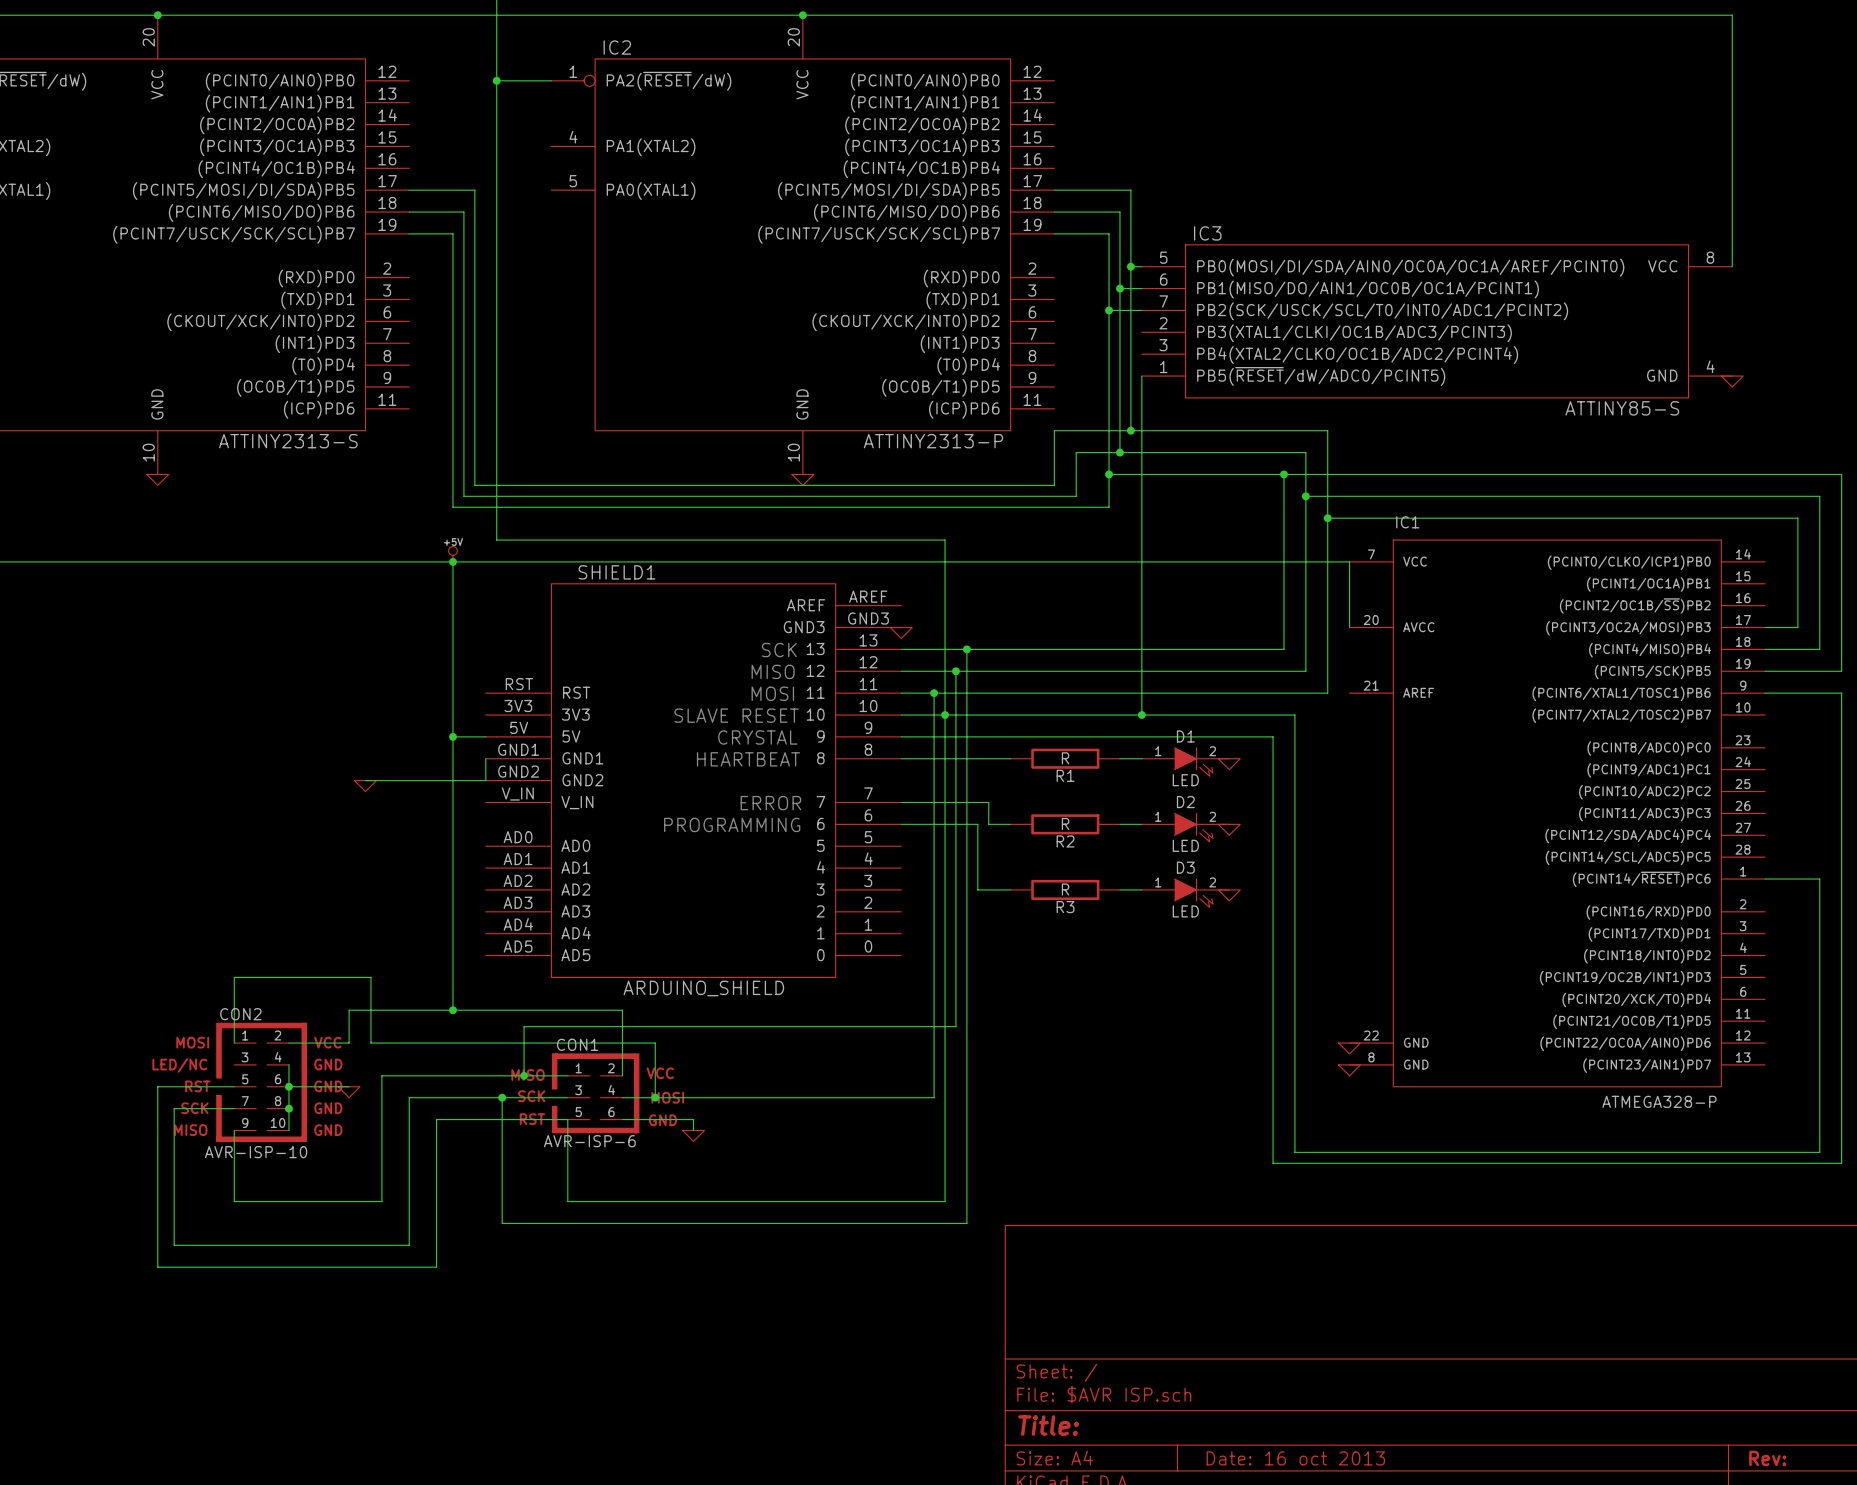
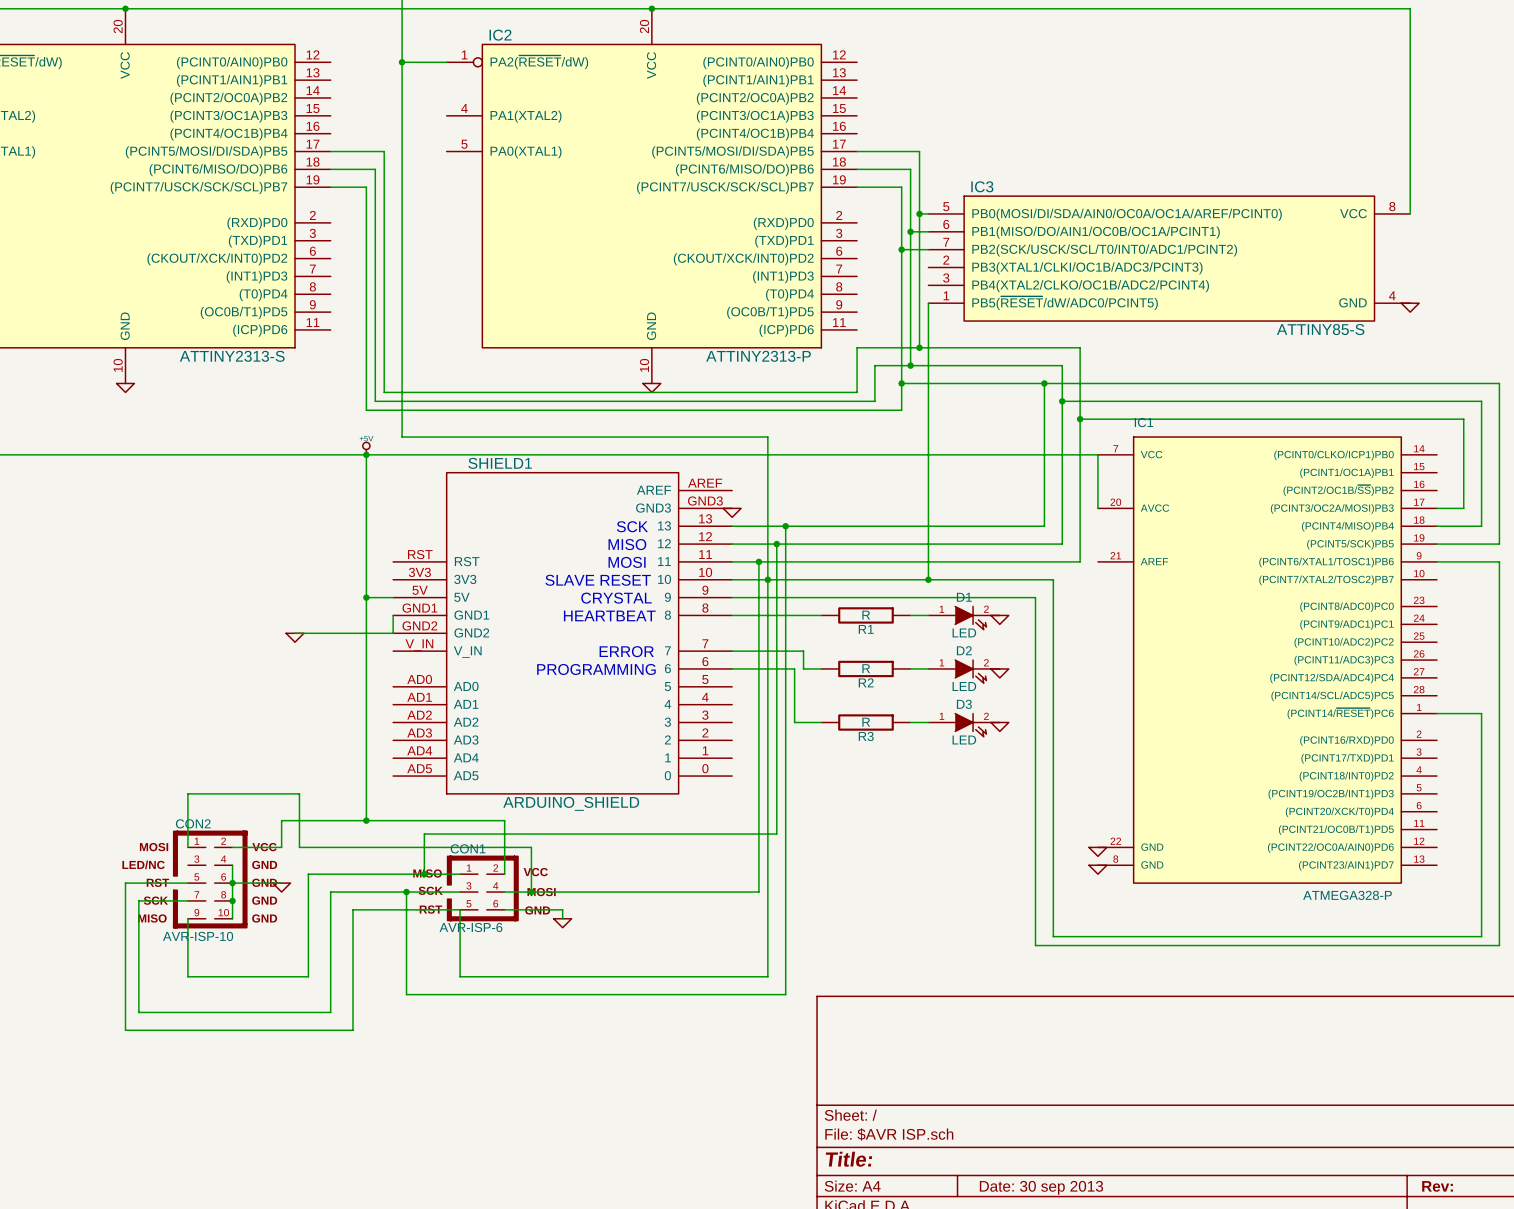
title block: Date: 16 oct 2013 (1295, 1458) -> Date: 30 sep 2013 (1041, 1187)

